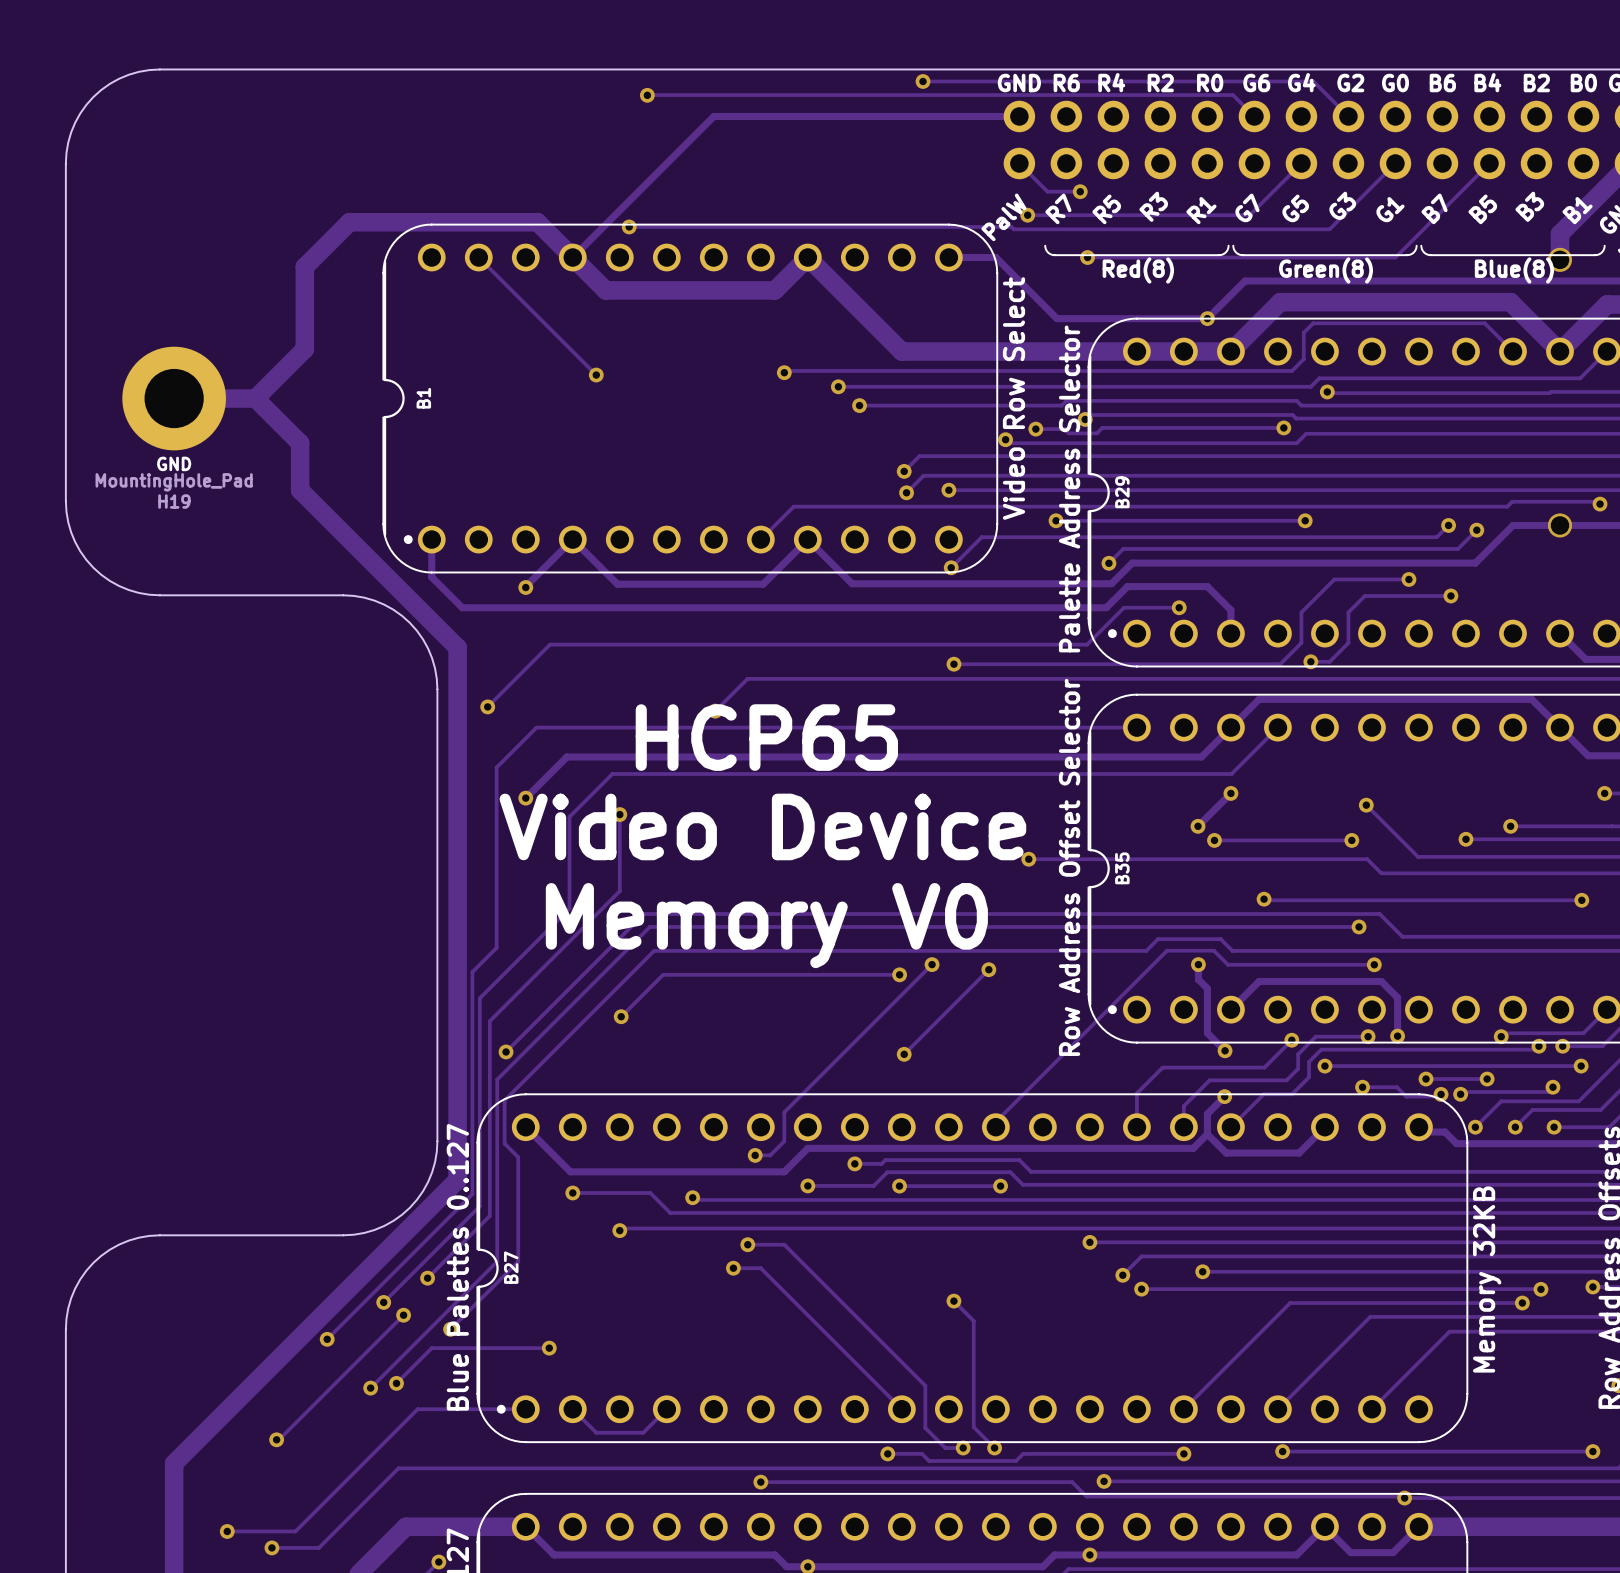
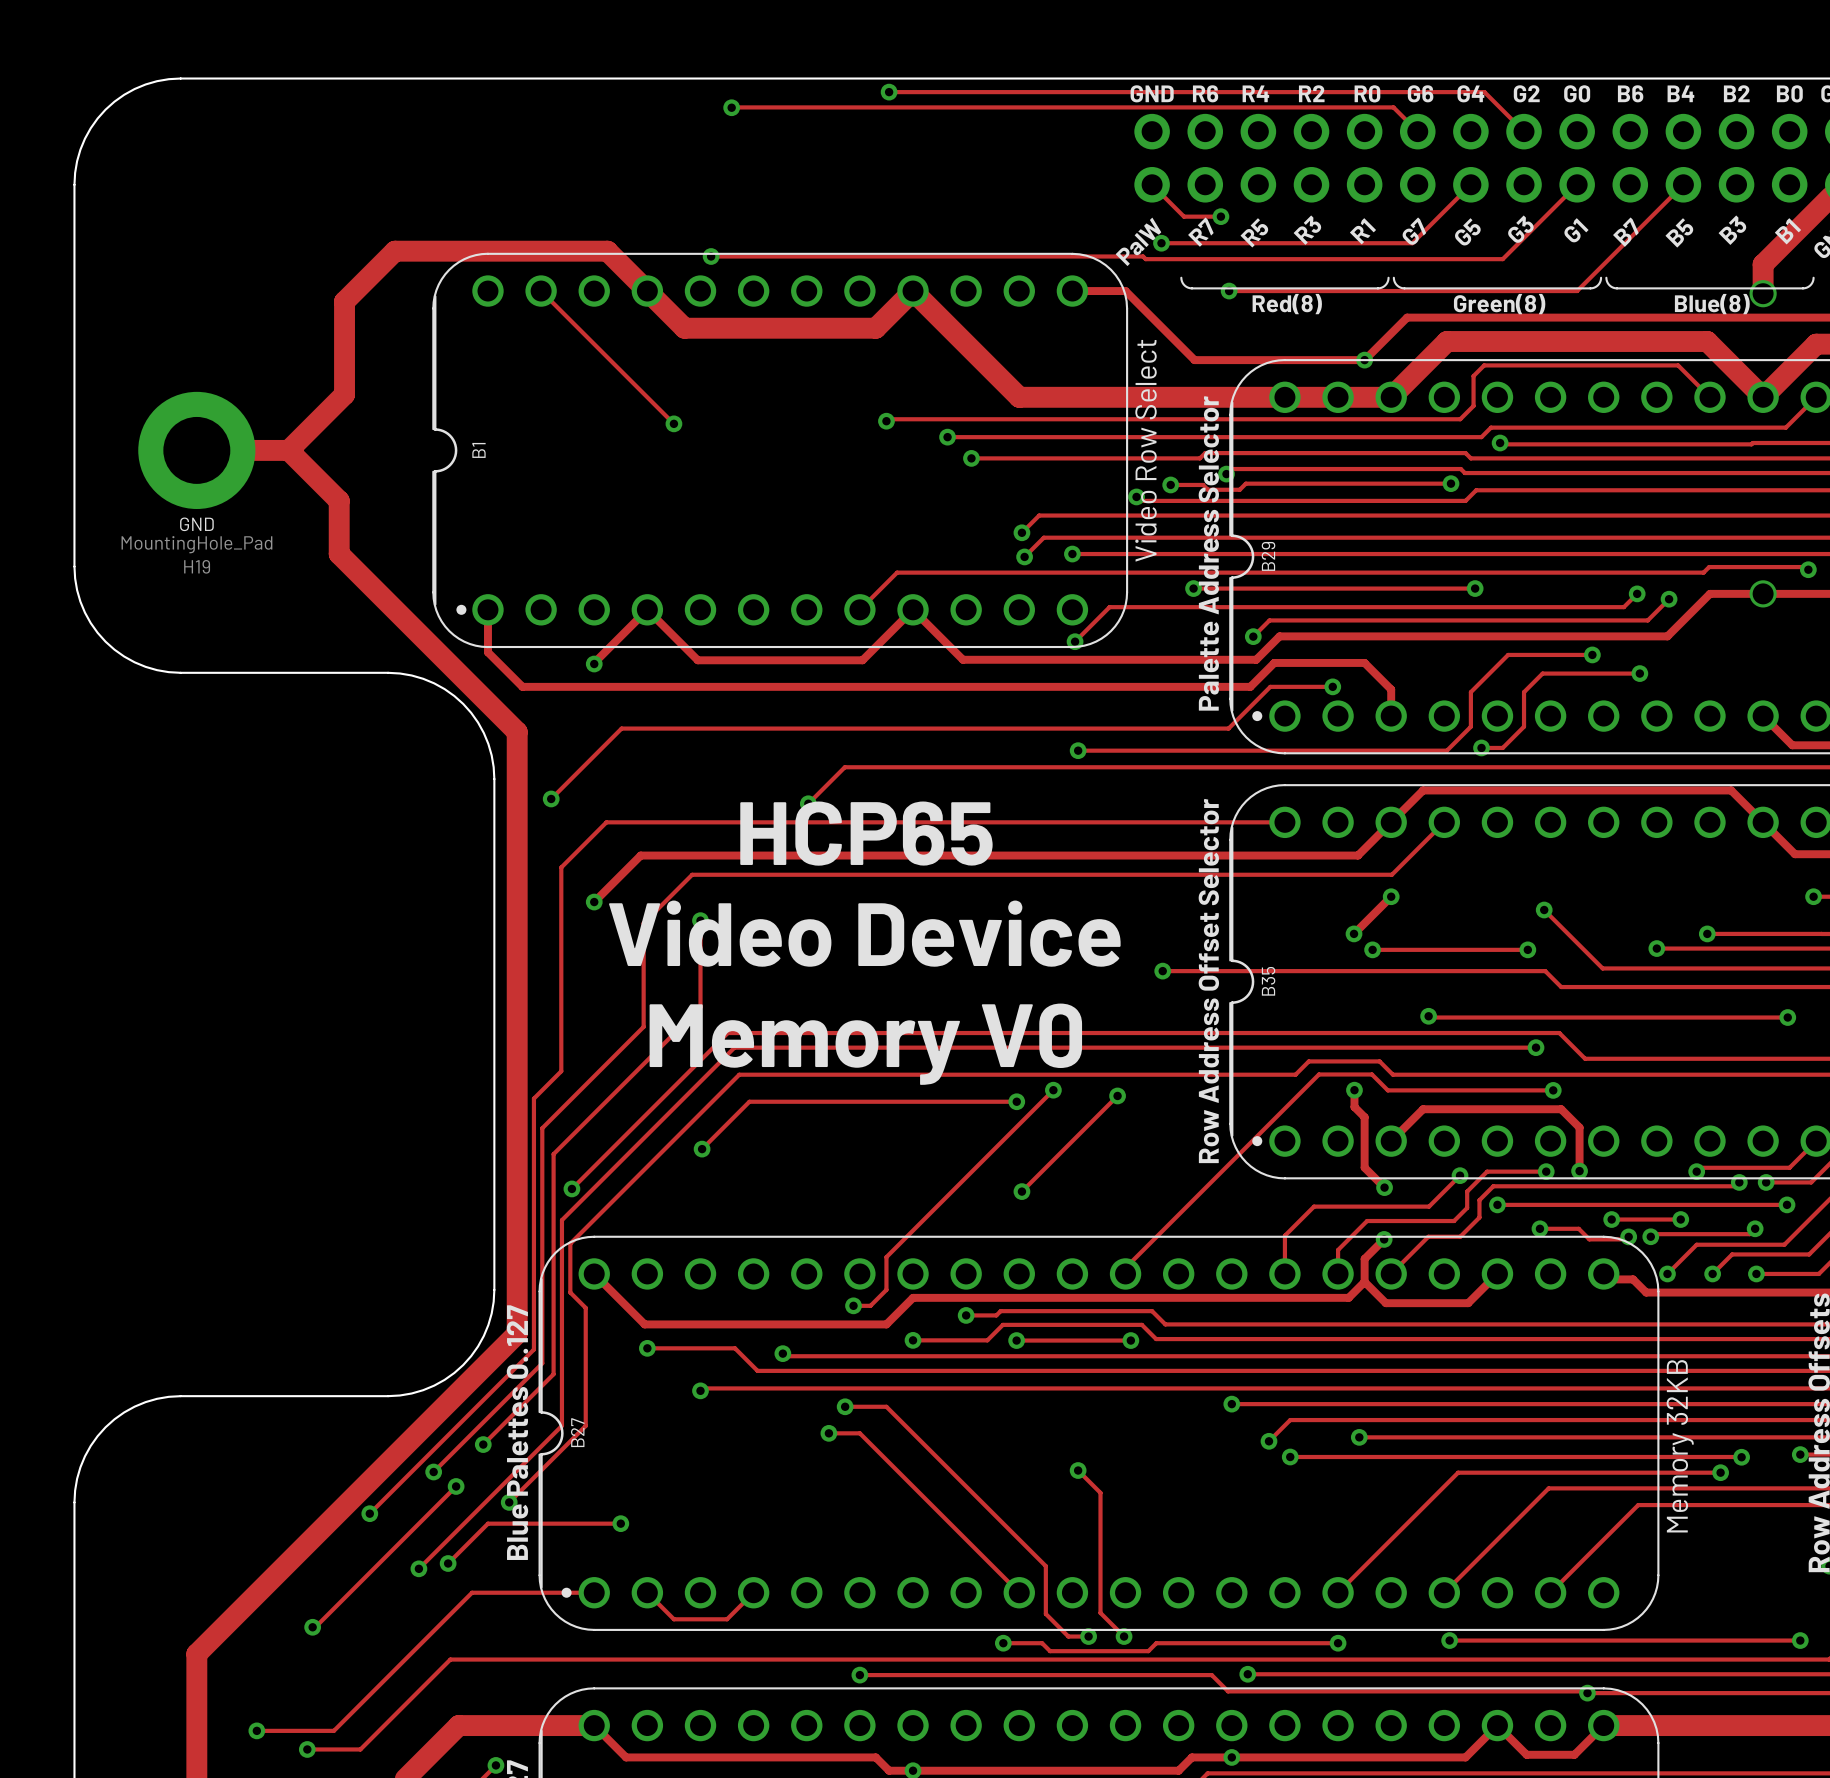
track: none -> (889, 92) (1043, 92)
via: none -> (889, 92)
via: (923, 81) -> none
track: (1019, 116) (713, 116) (572, 257) -> none

